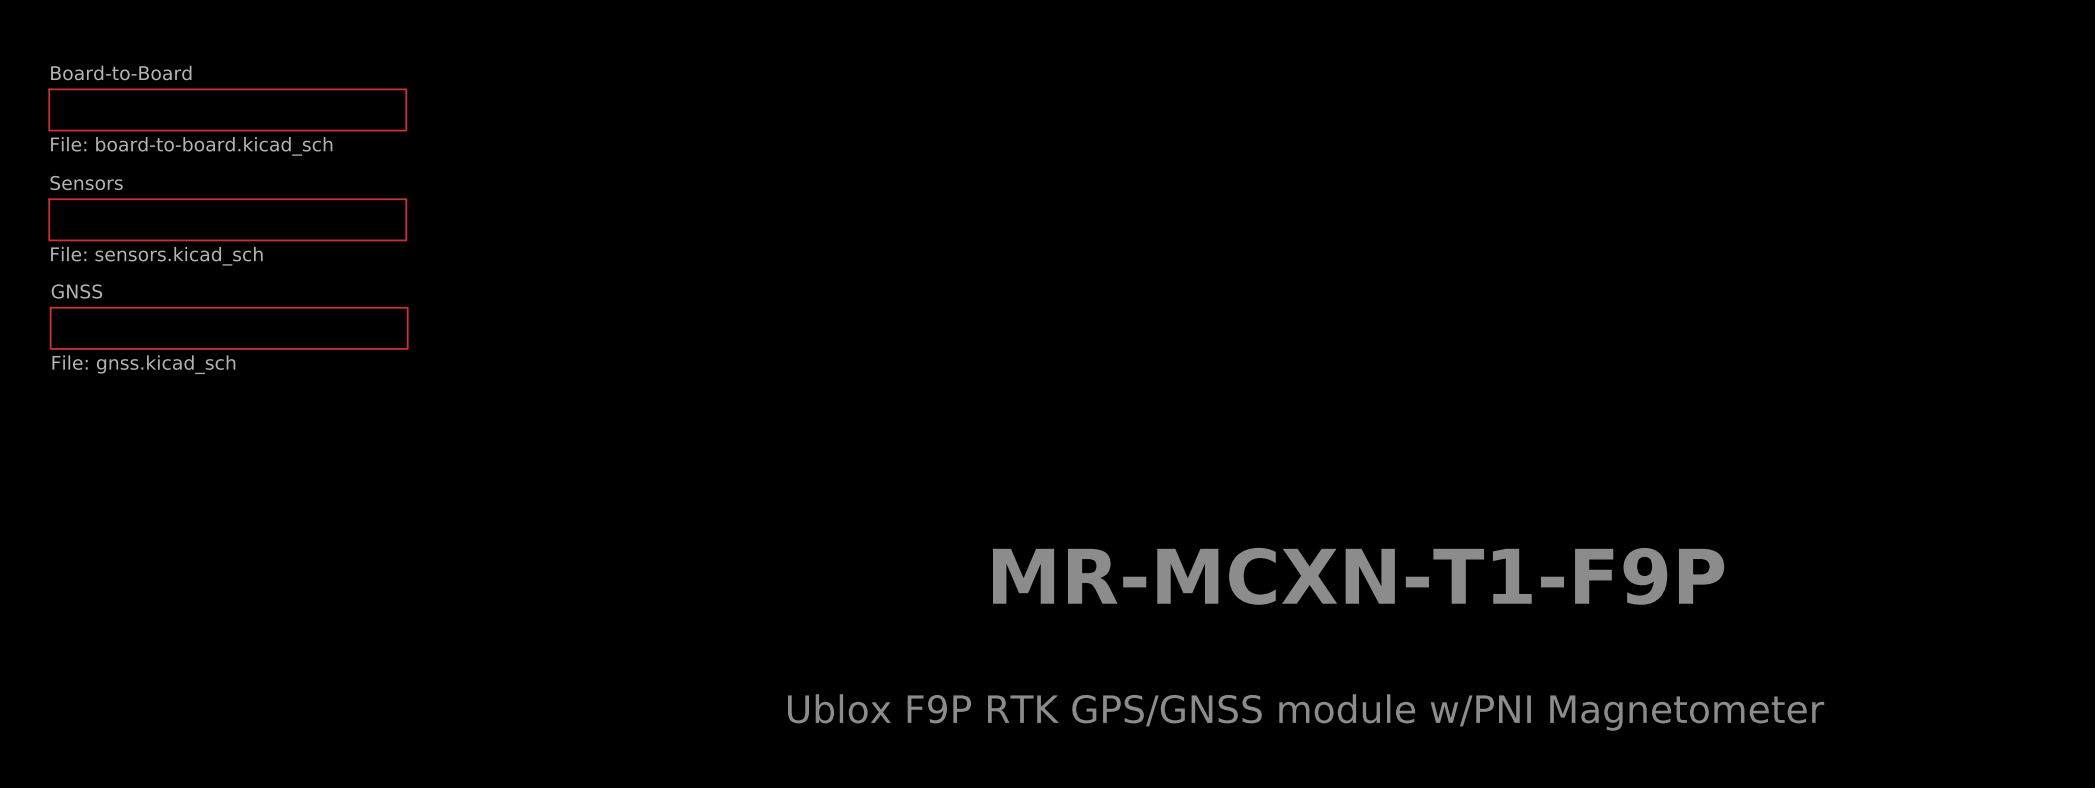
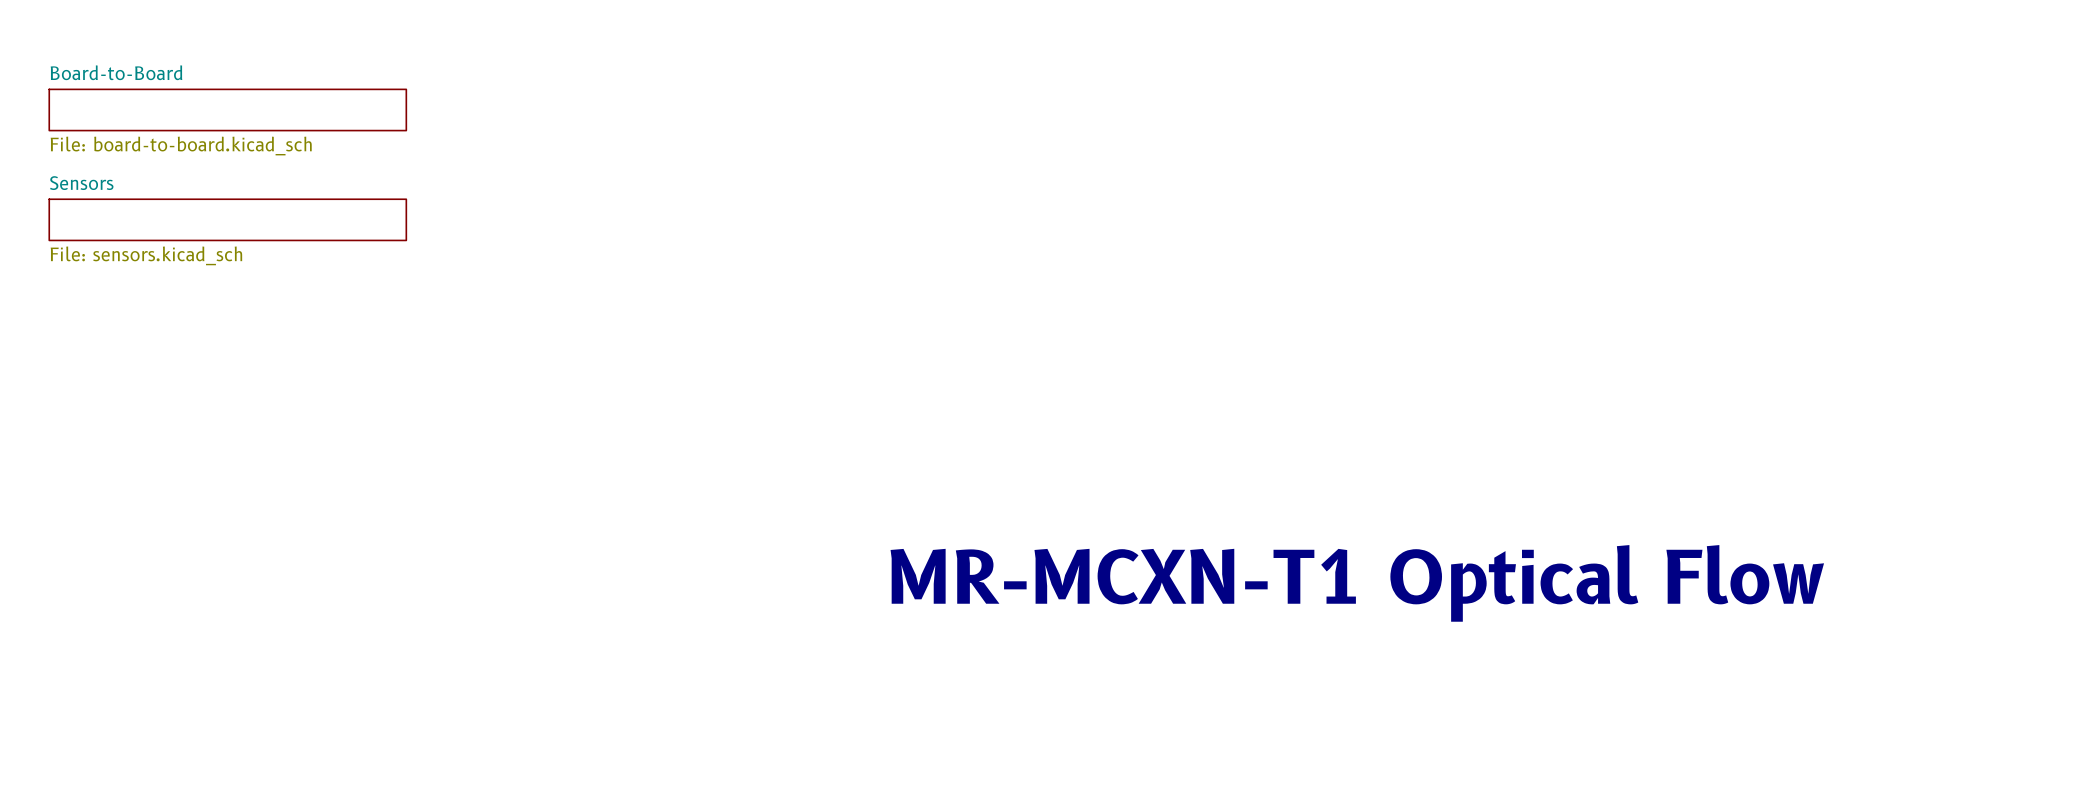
sheet GNSS: File: gnss.kicad_sch (229, 328) -> none
text: MR-MCXN-T1-F9P (1358, 576) -> MR-MCXN-T1 Optical Flow (1357, 583)
text: Ublox F9P RTK GPS/GNSS module w/PNI Magnetometer (1306, 712) -> none

